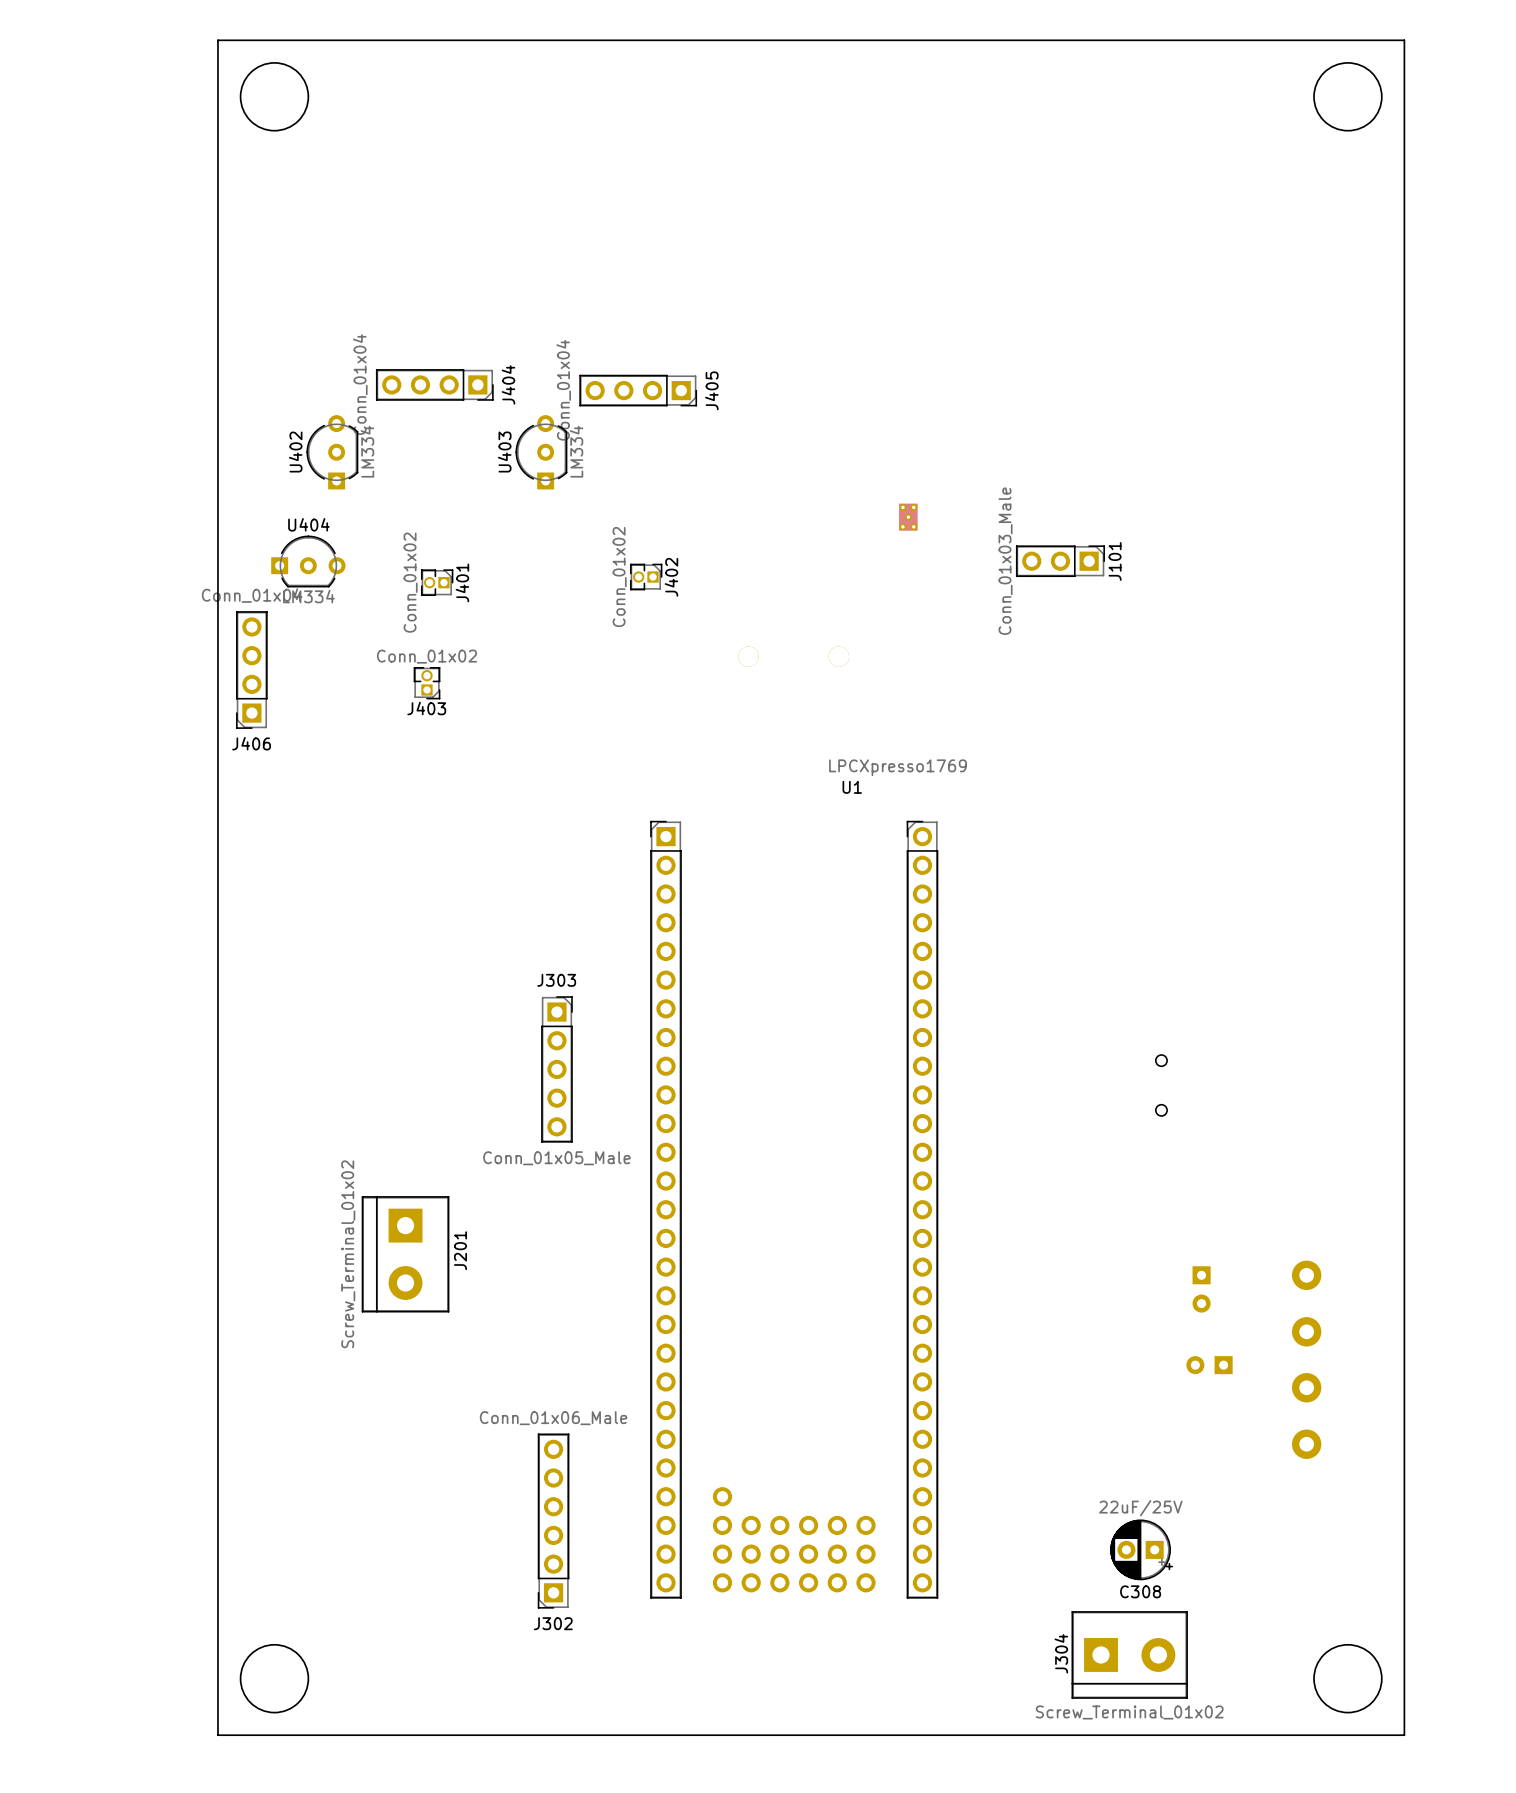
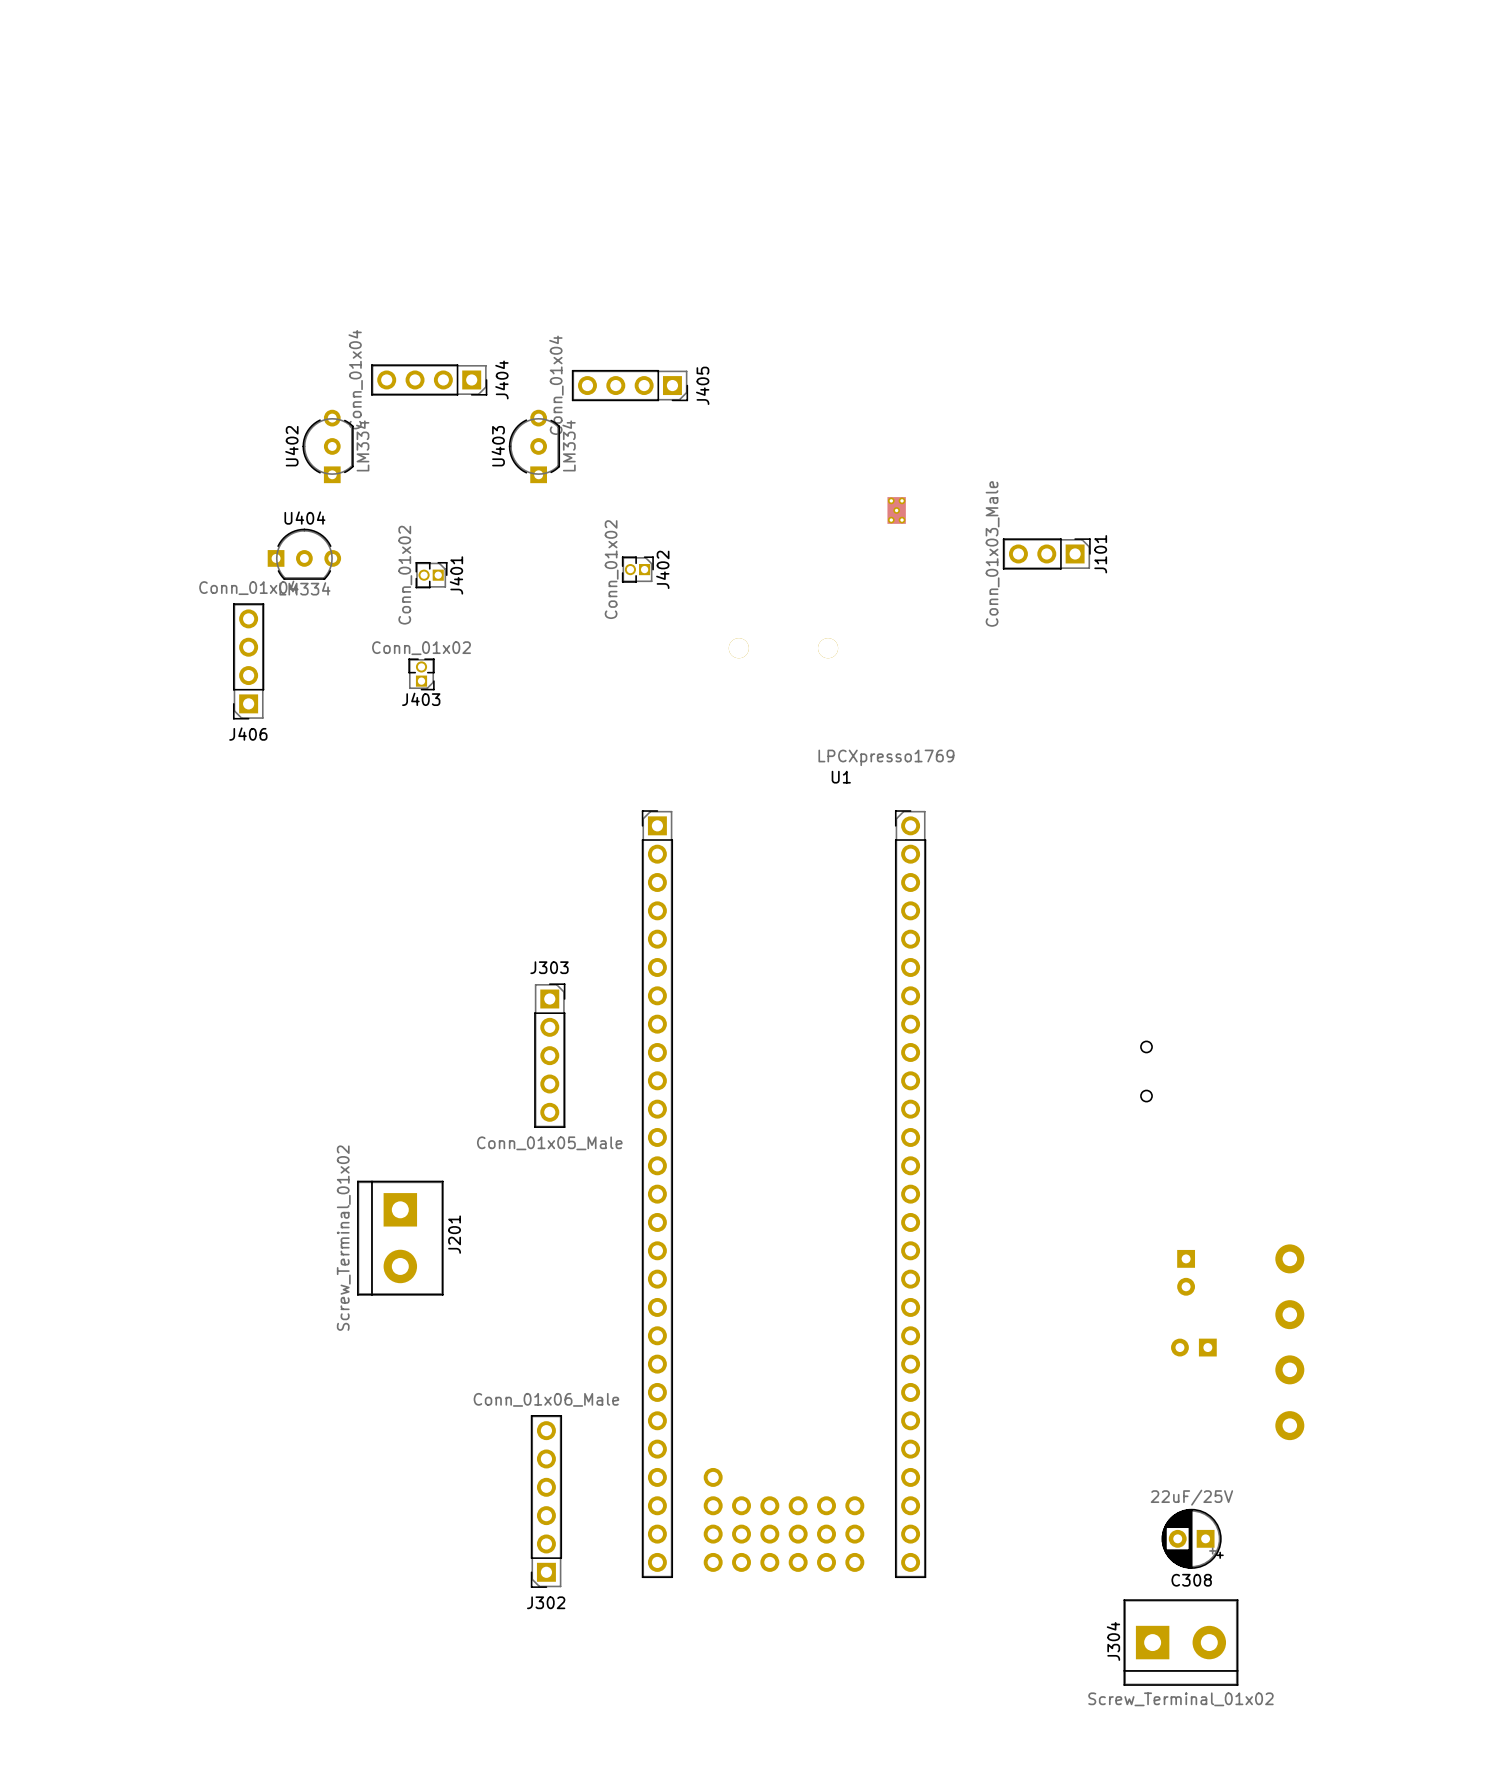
board edge: (217, 40) (217, 1735) (1404, 1735) (1404, 40) (217, 40) -> none
round board edge: [239, 62, 310, 132] -> none
round board edge: [1313, 62, 1383, 132] -> none
C308 position: (1141, 1549) -> (1192, 1538)
round board edge: [239, 1643, 310, 1714] -> none
round board edge: [1313, 1643, 1383, 1714] -> none
J304 position: (1129, 1654) -> (1180, 1642)

